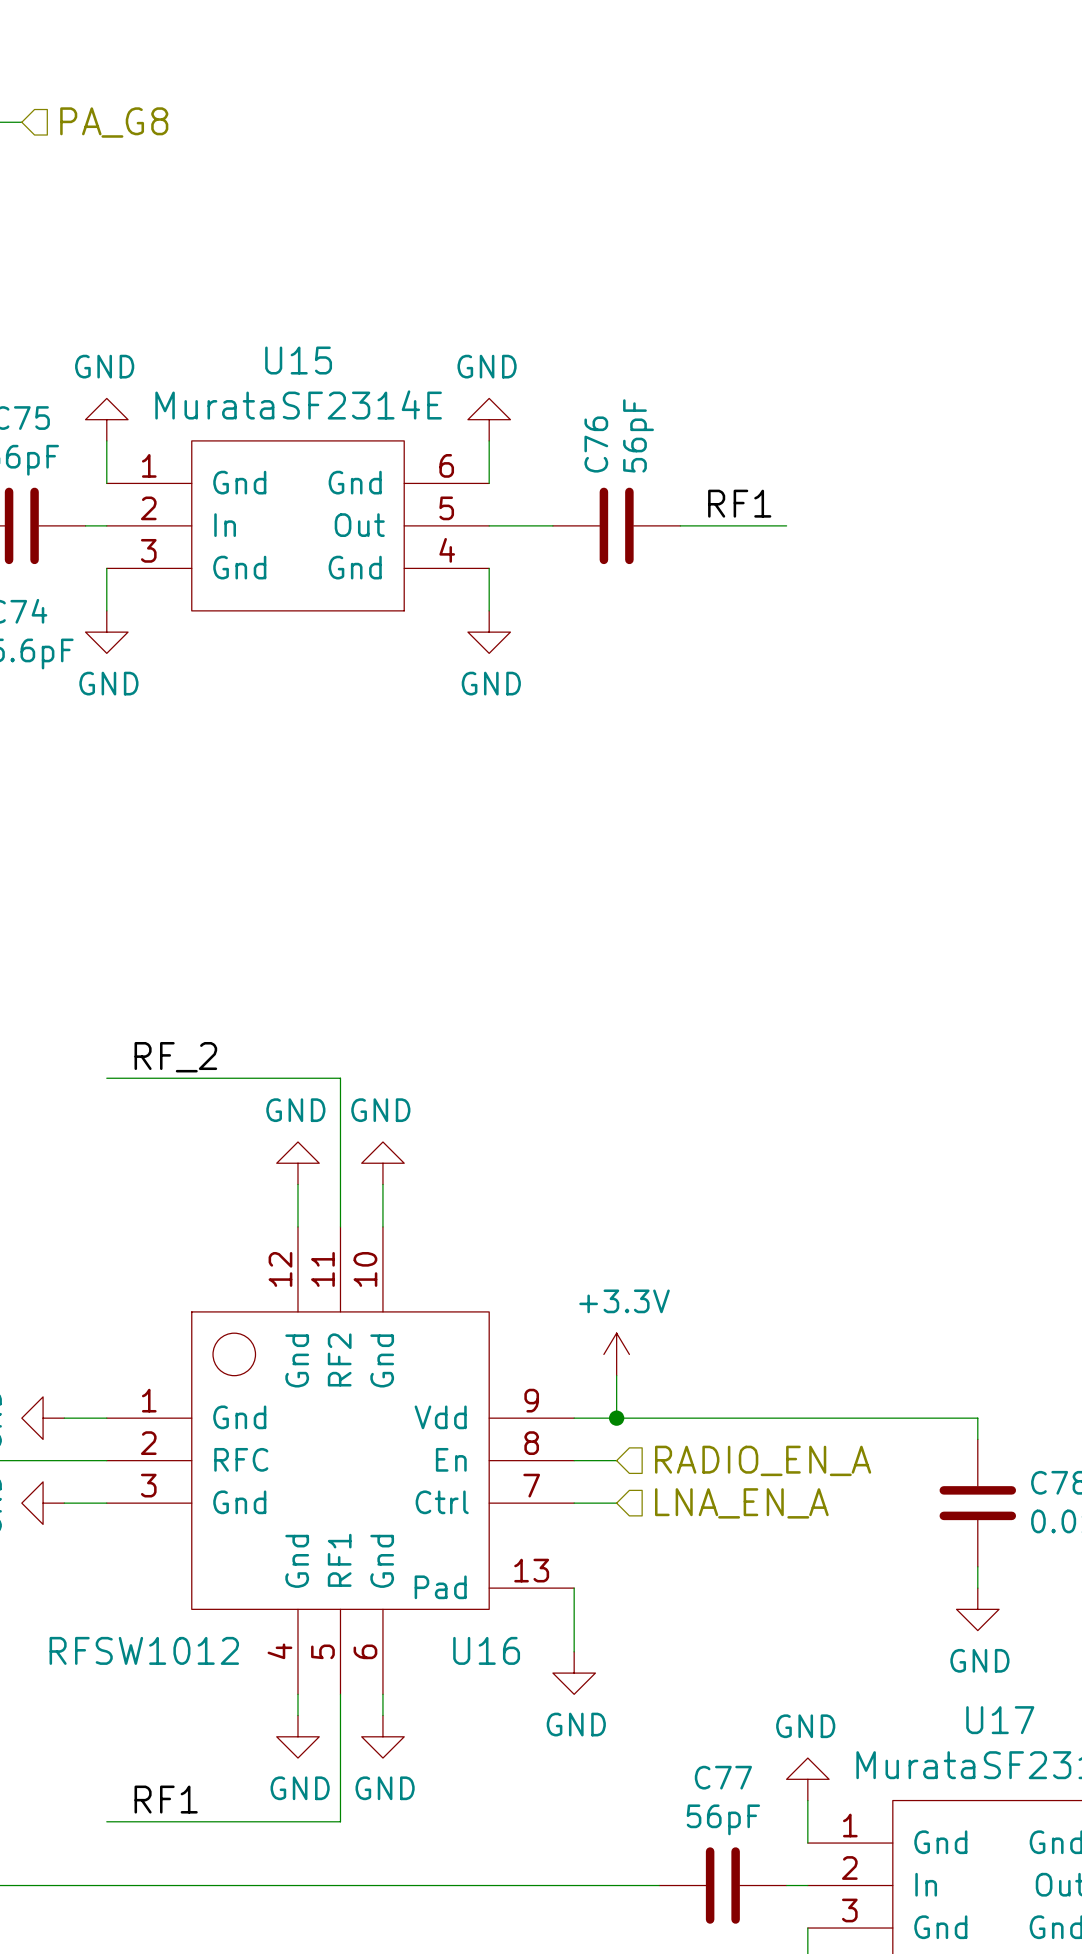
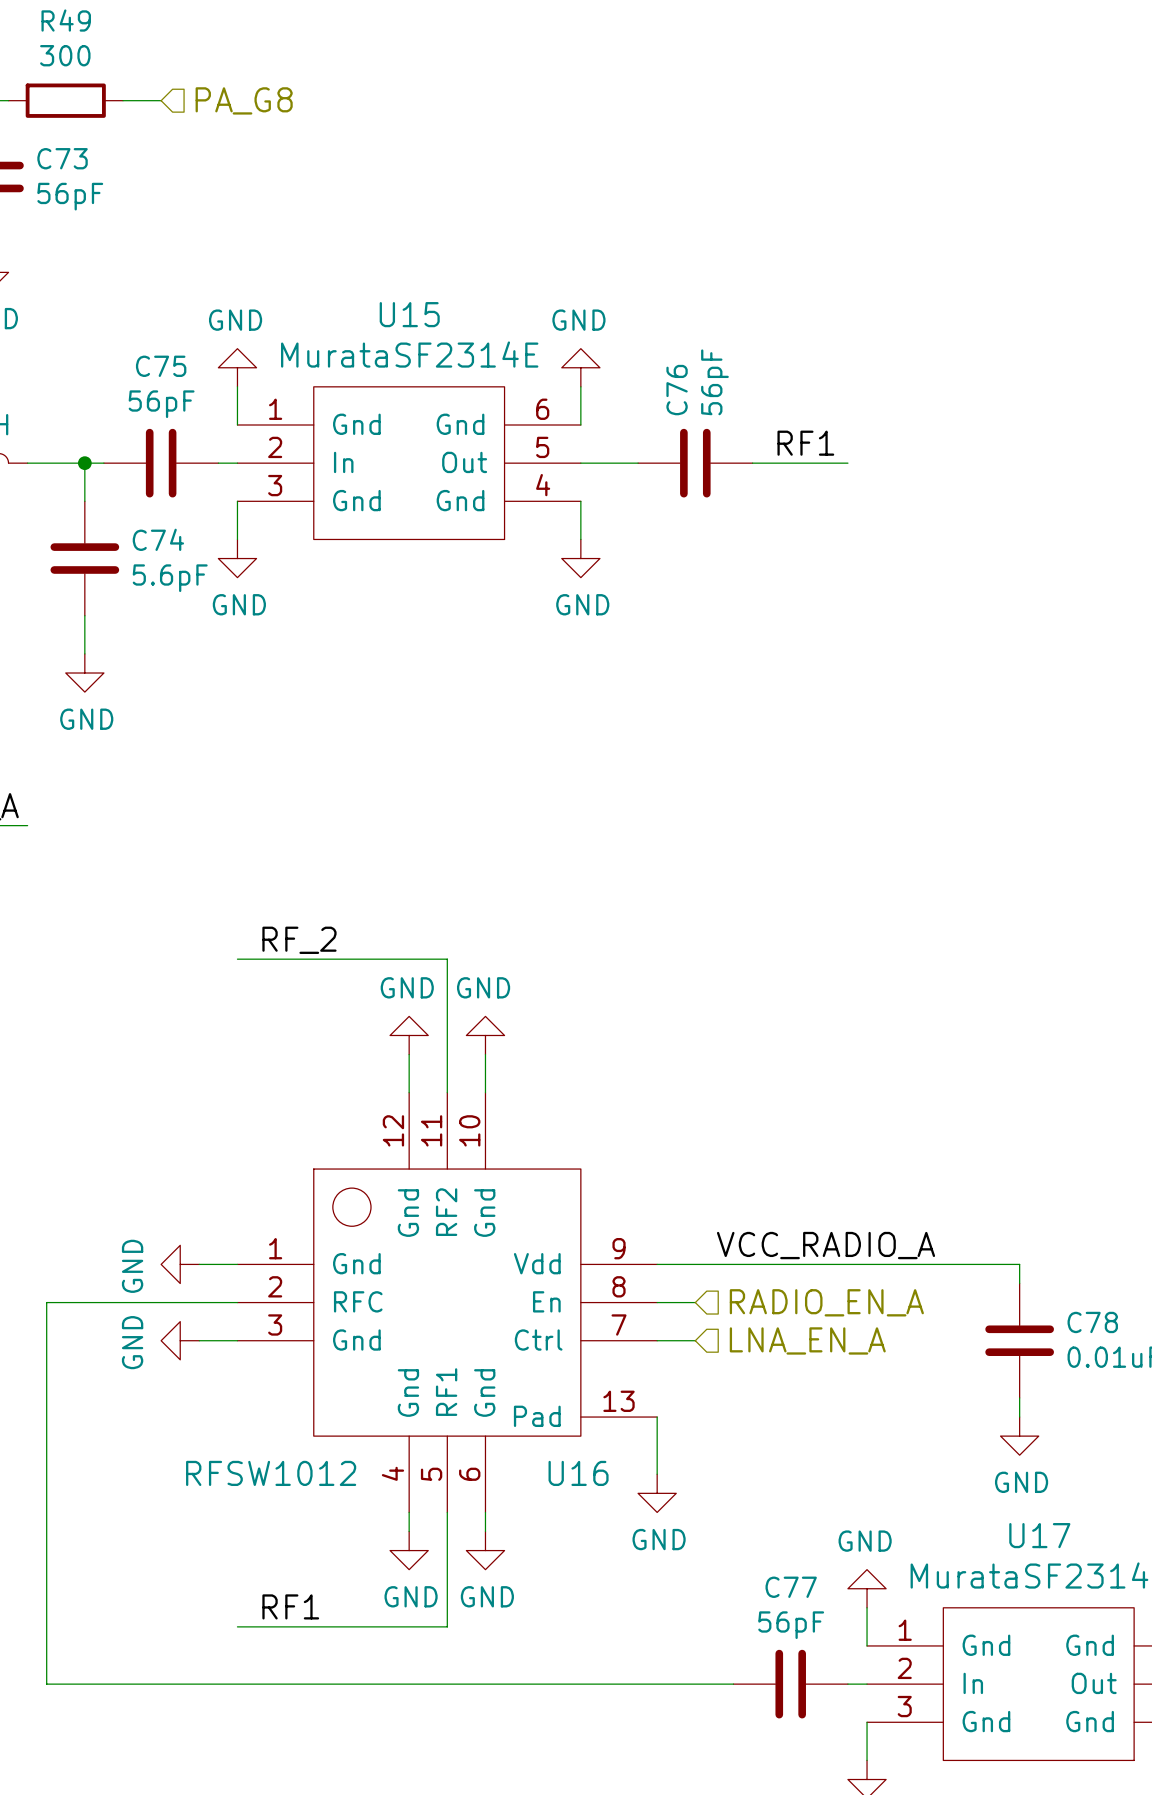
power symbol: +3.3V (616, 1354) -> none
wire: (616, 1375) (616, 1418) -> none
label: none -> VCC_RADIO_A (826, 1245)
junction: (616, 1418) -> none

